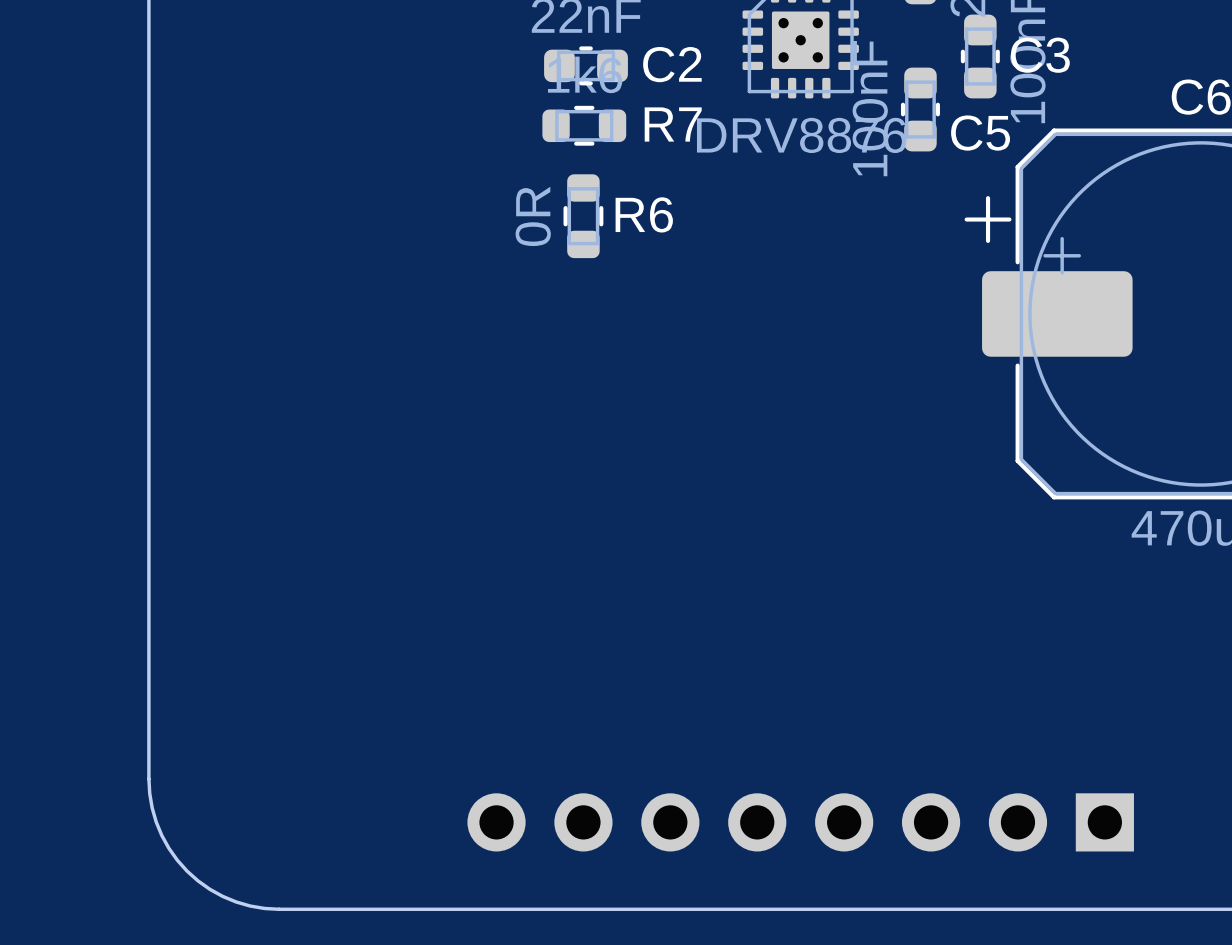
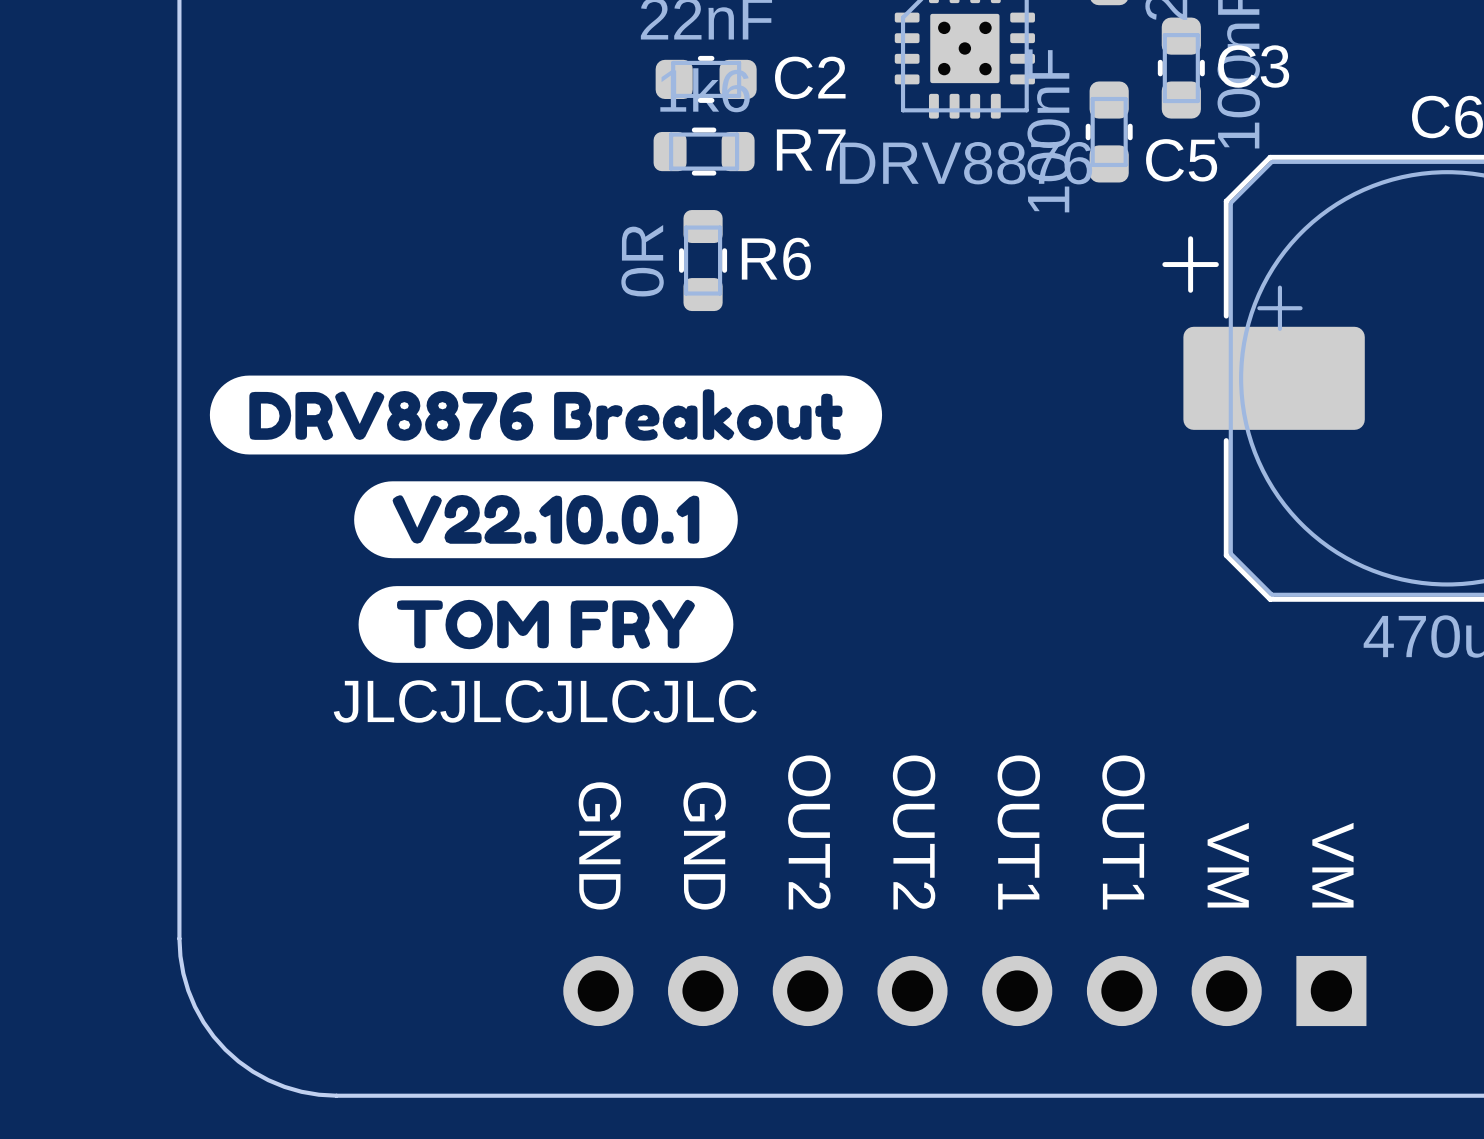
drawing: none -> [209, 375, 883, 663]
text: none -> JLCJLCJLCJLC (545, 701)
text: none -> OUT2 (809, 832)
text: none -> OUT2 (914, 832)
text: none -> OUT1 (1018, 832)
text: none -> OUT1 (1123, 832)
text: none -> GND (599, 845)
text: none -> GND (704, 845)
text: none -> VM (1228, 865)
text: none -> VM (1332, 865)

